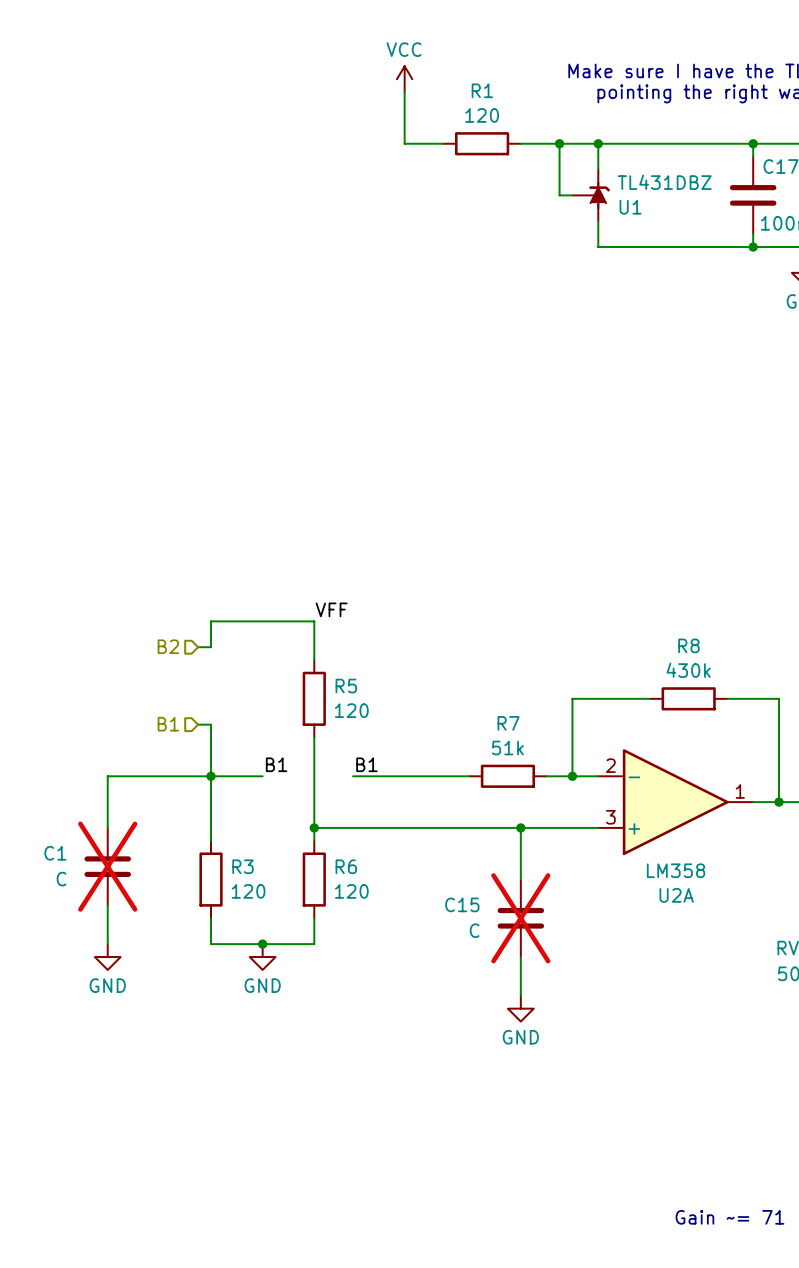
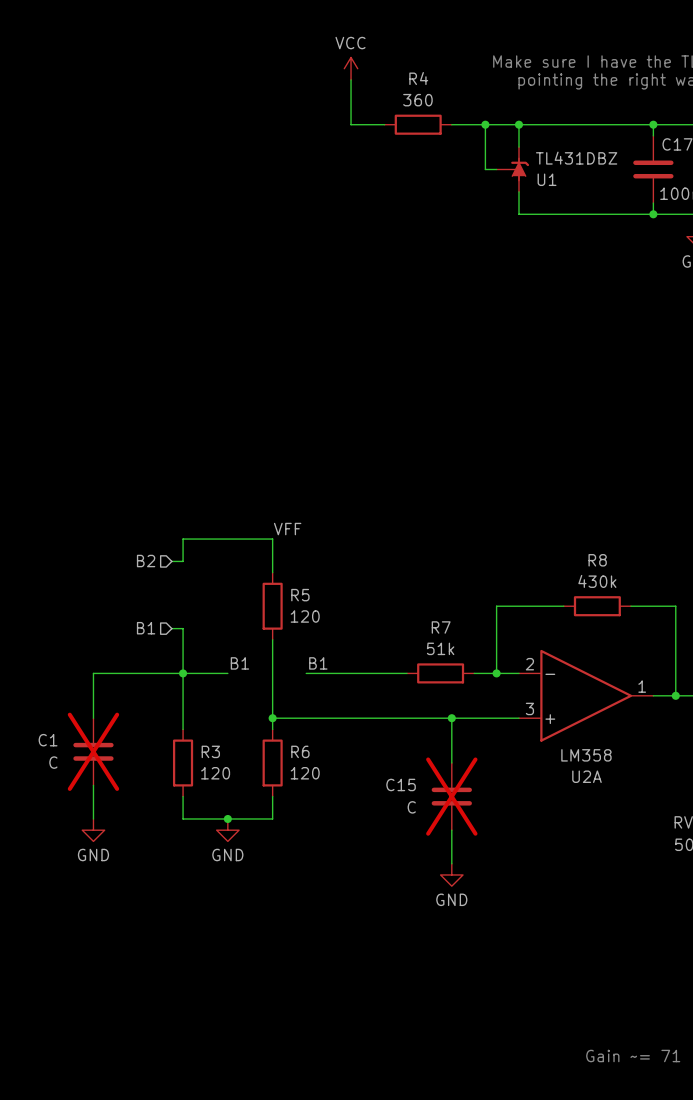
R1 name: R1 (482, 90) -> R4 (418, 78)
R1 value: 120 (482, 115) -> 360 (417, 100)

